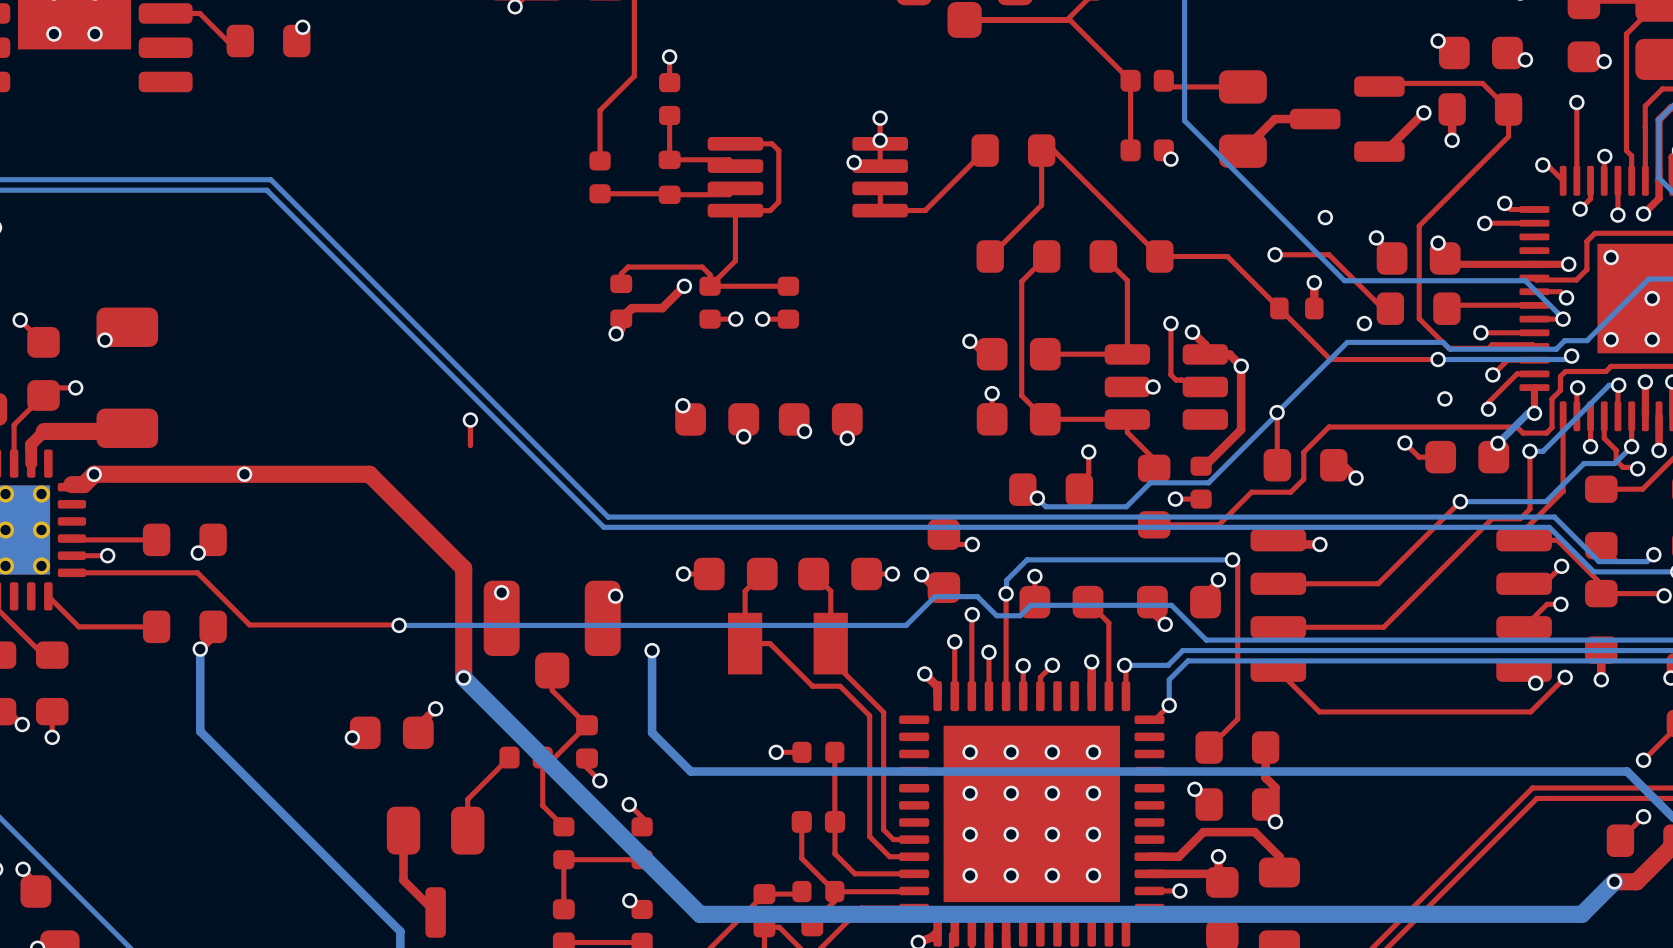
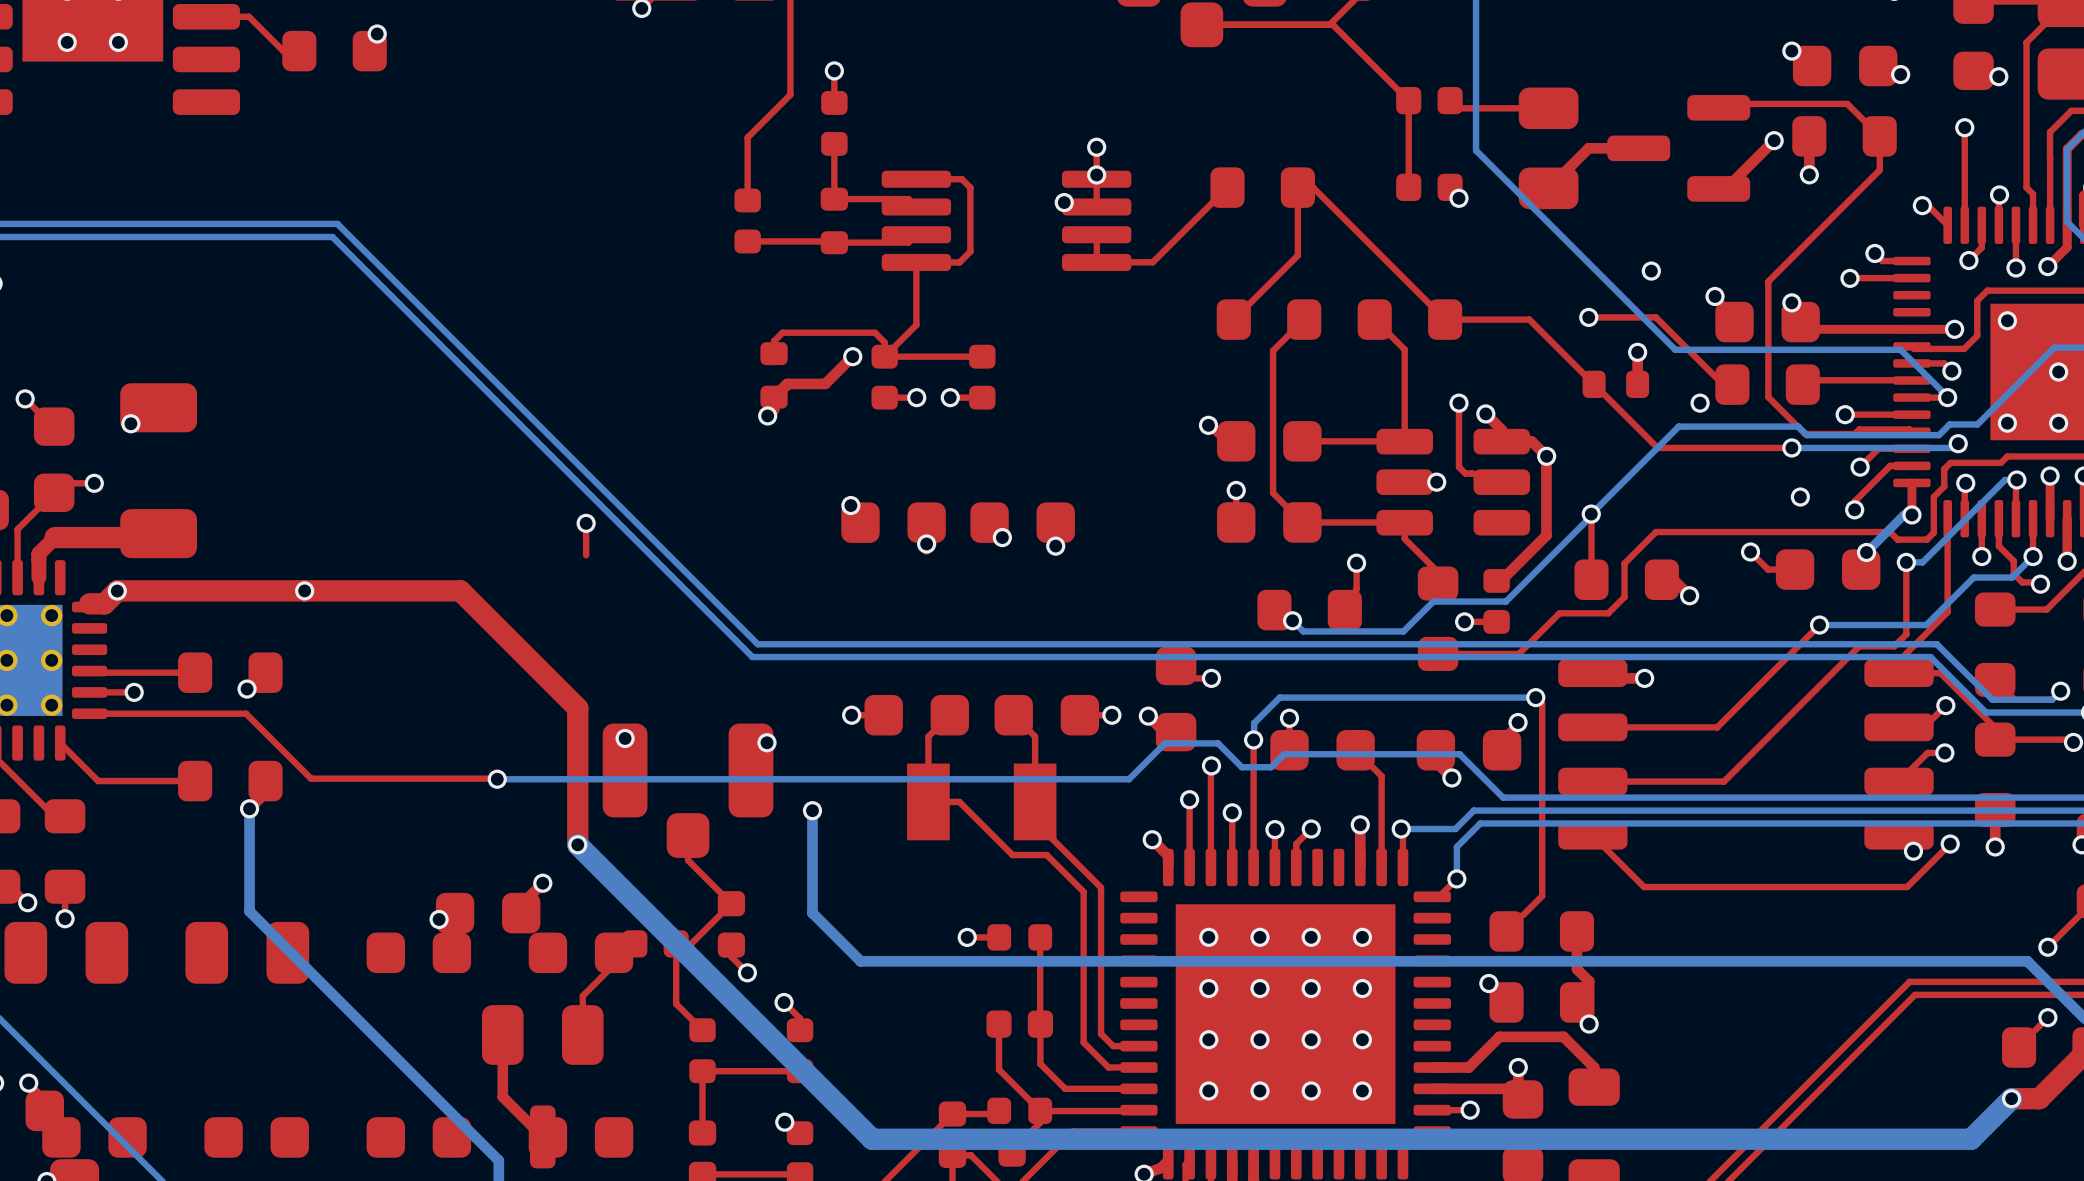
part: none -> (66, 952)
part: none -> (247, 952)
part: none -> (418, 952)
part: none -> (580, 952)
part: none -> (94, 1137)
part: none -> (256, 1137)
part: none -> (418, 1137)
part: none -> (580, 1137)

